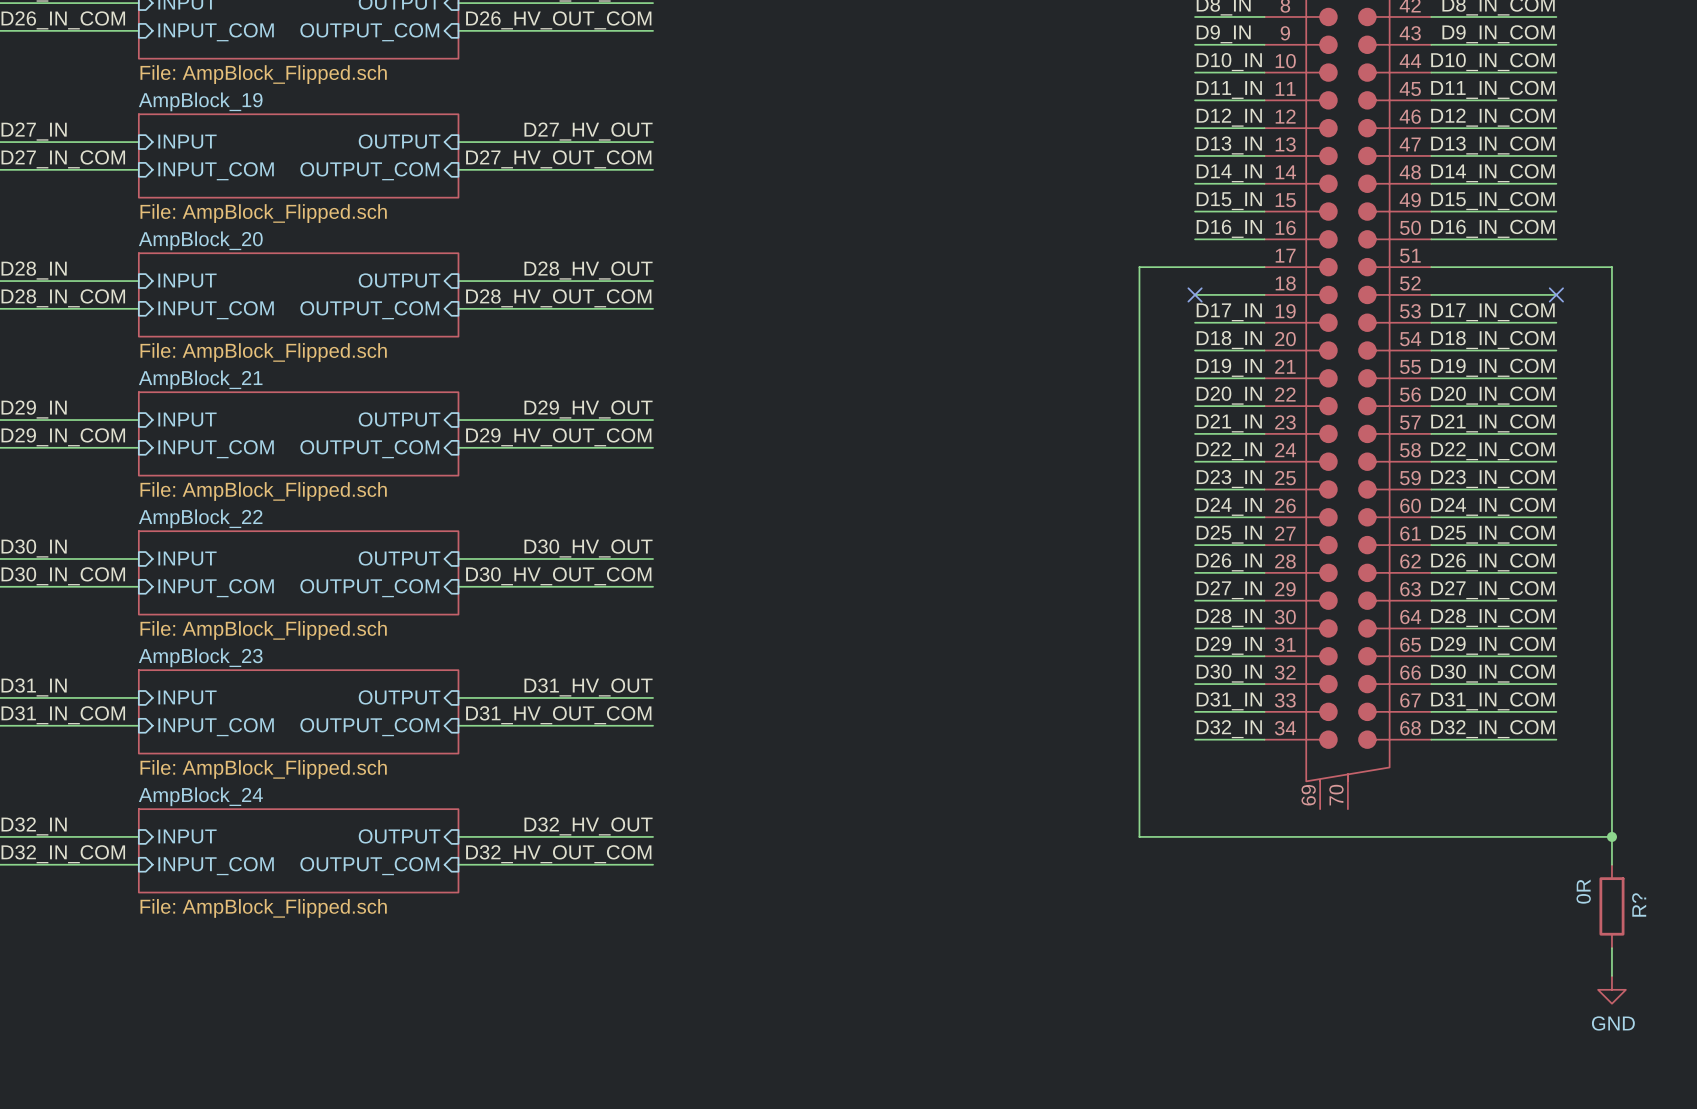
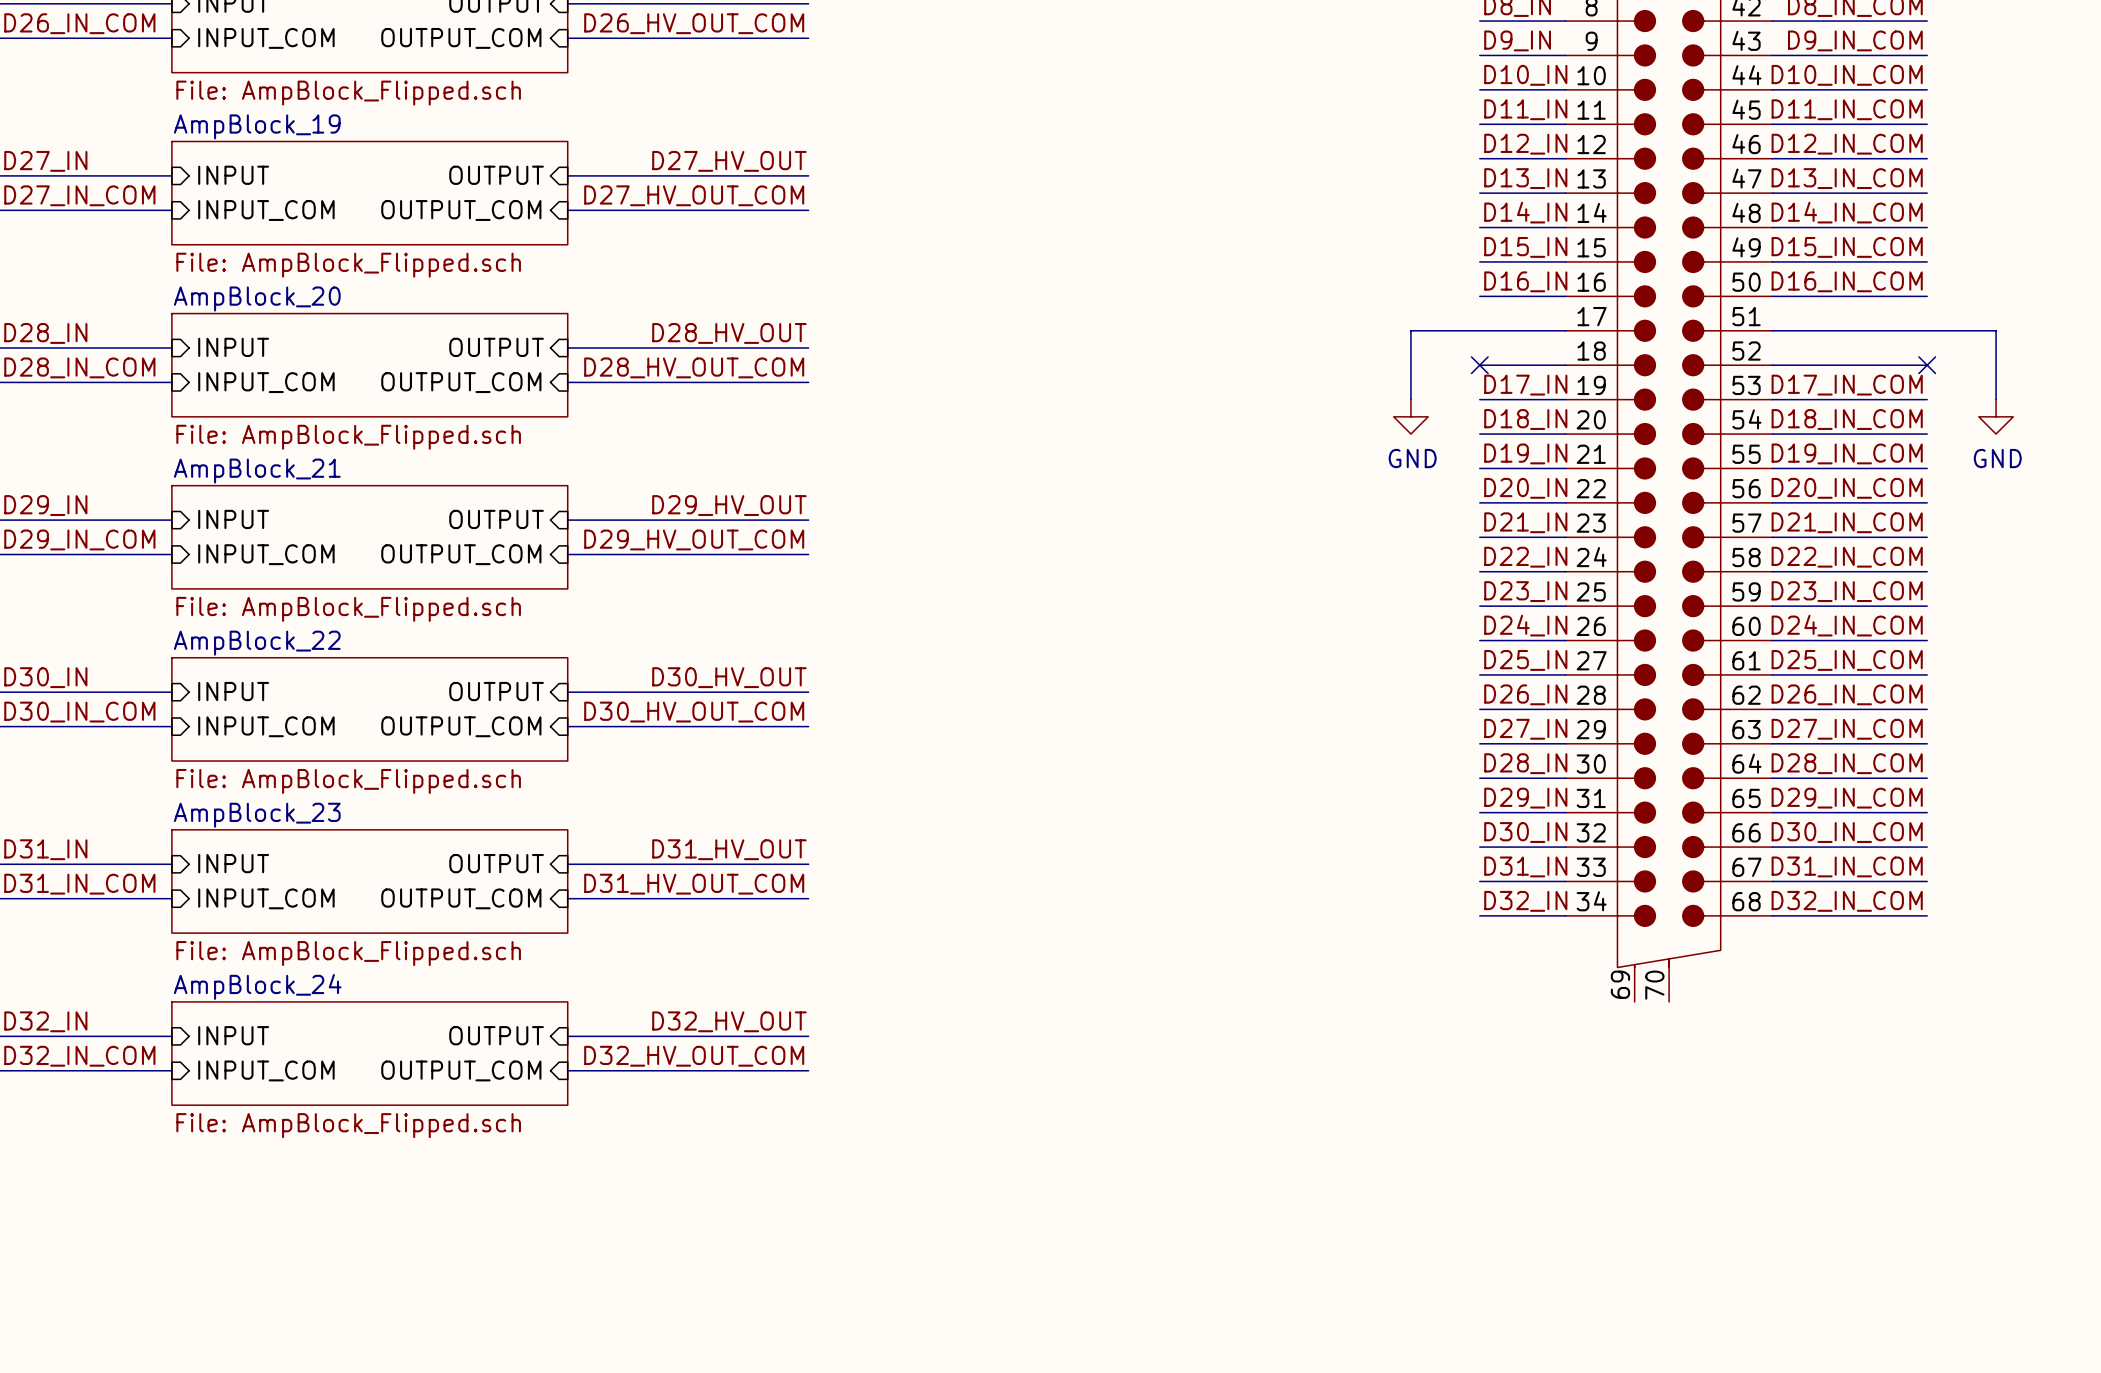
wire: (1139, 322) (1139, 836) (1611, 836) -> none
wire: (1611, 322) (1611, 864) -> none
power symbol: none -> GND (1410, 416)
power symbol: none -> GND (1996, 416)
junction: (1611, 836) -> none
R?: 0R (1611, 906) -> none
wire: (1611, 948) (1611, 975) -> none
power symbol: GND (1611, 989) -> none

